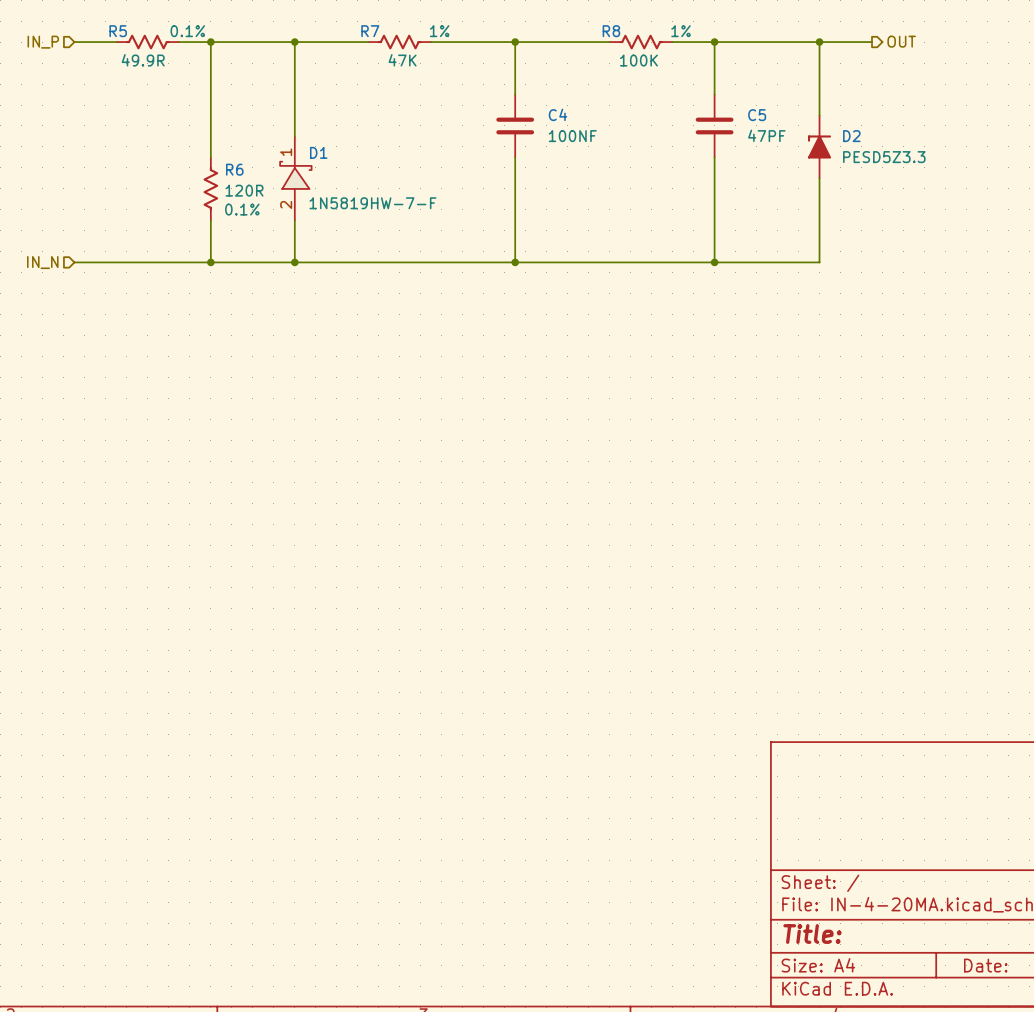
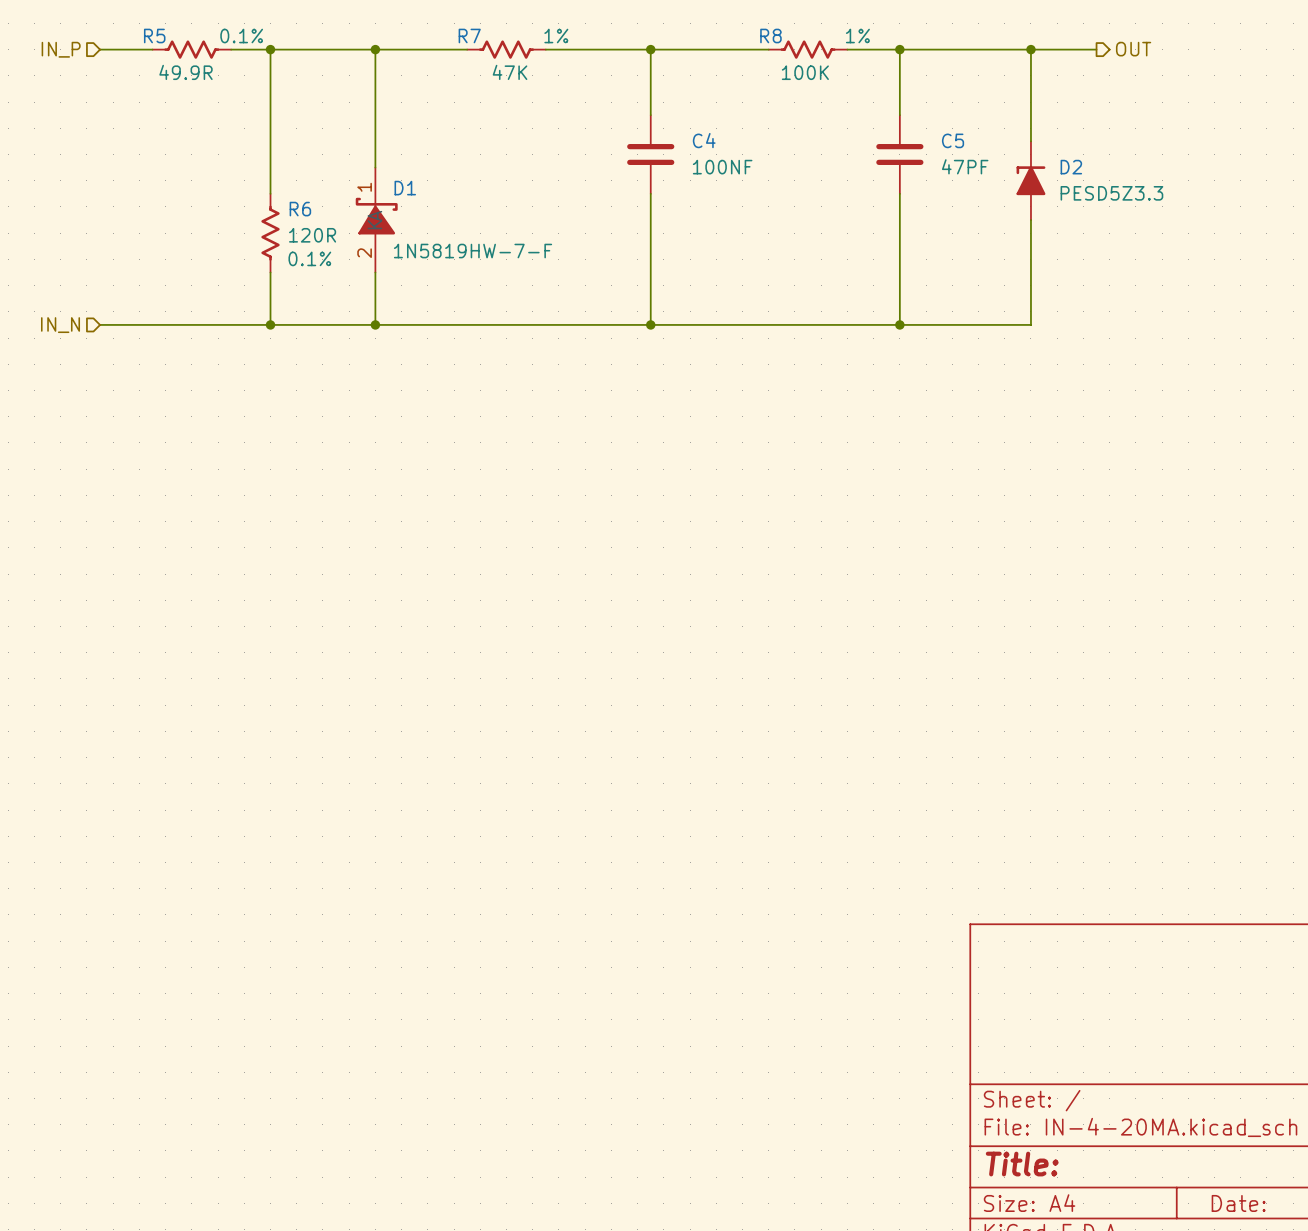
D1 symbol: [280, 136, 312, 221] -> [355, 167, 398, 273]

